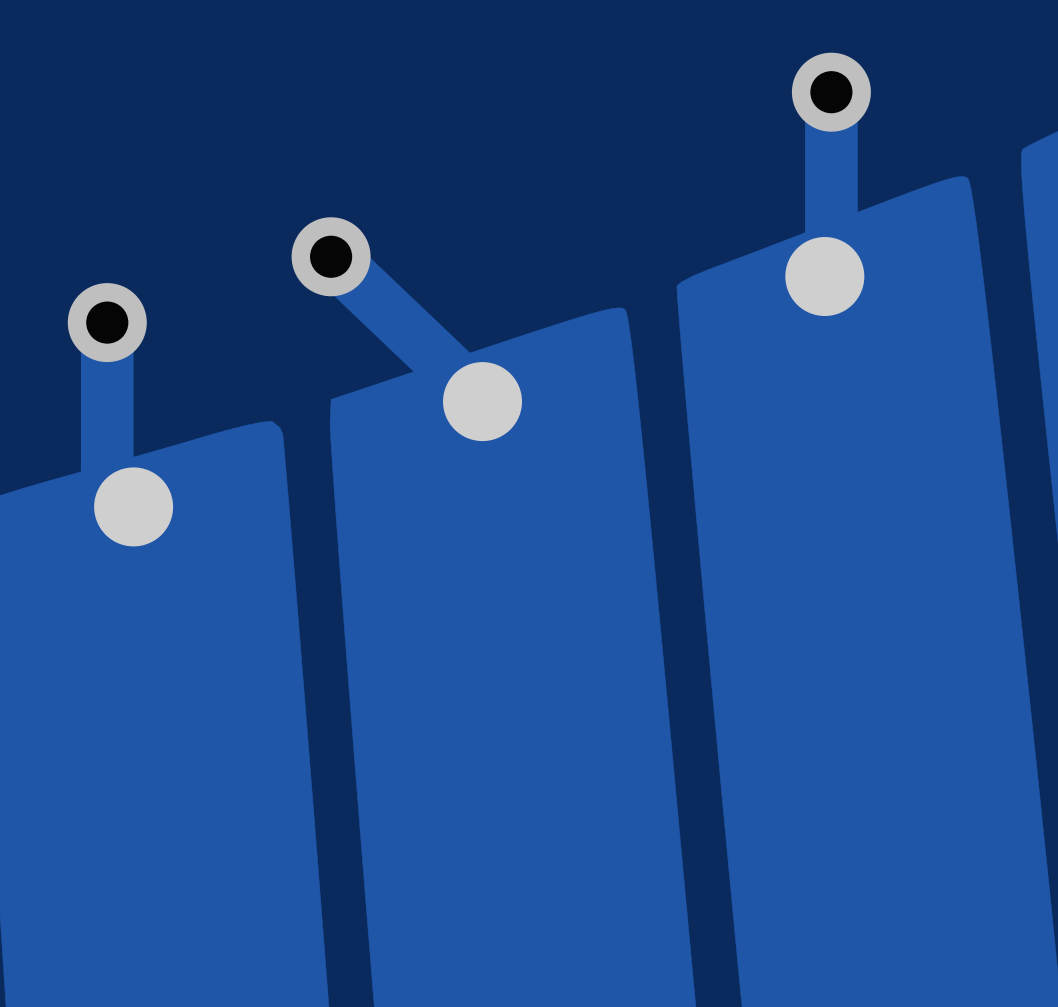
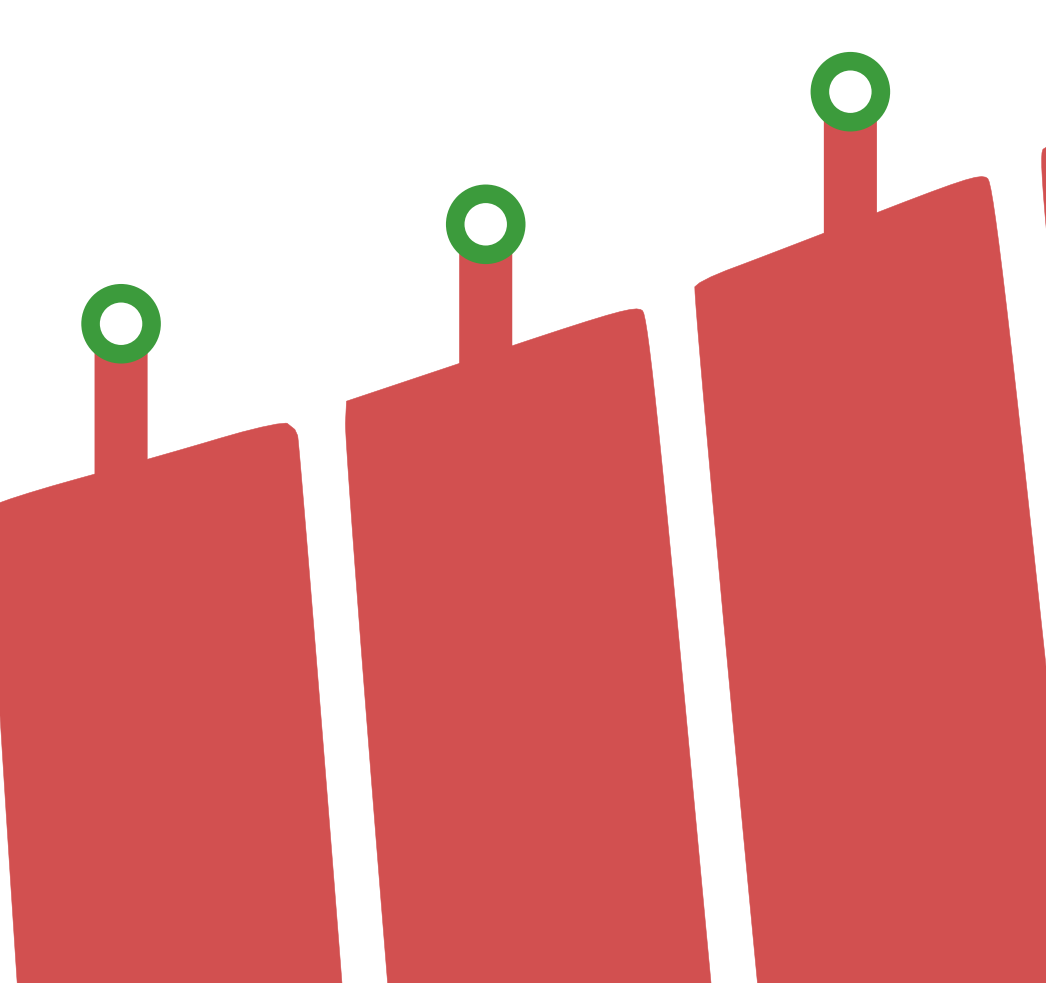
track: (331, 256) (469, 388) -> (485, 224) (485, 390)
via position: (331, 256) -> (485, 224)

